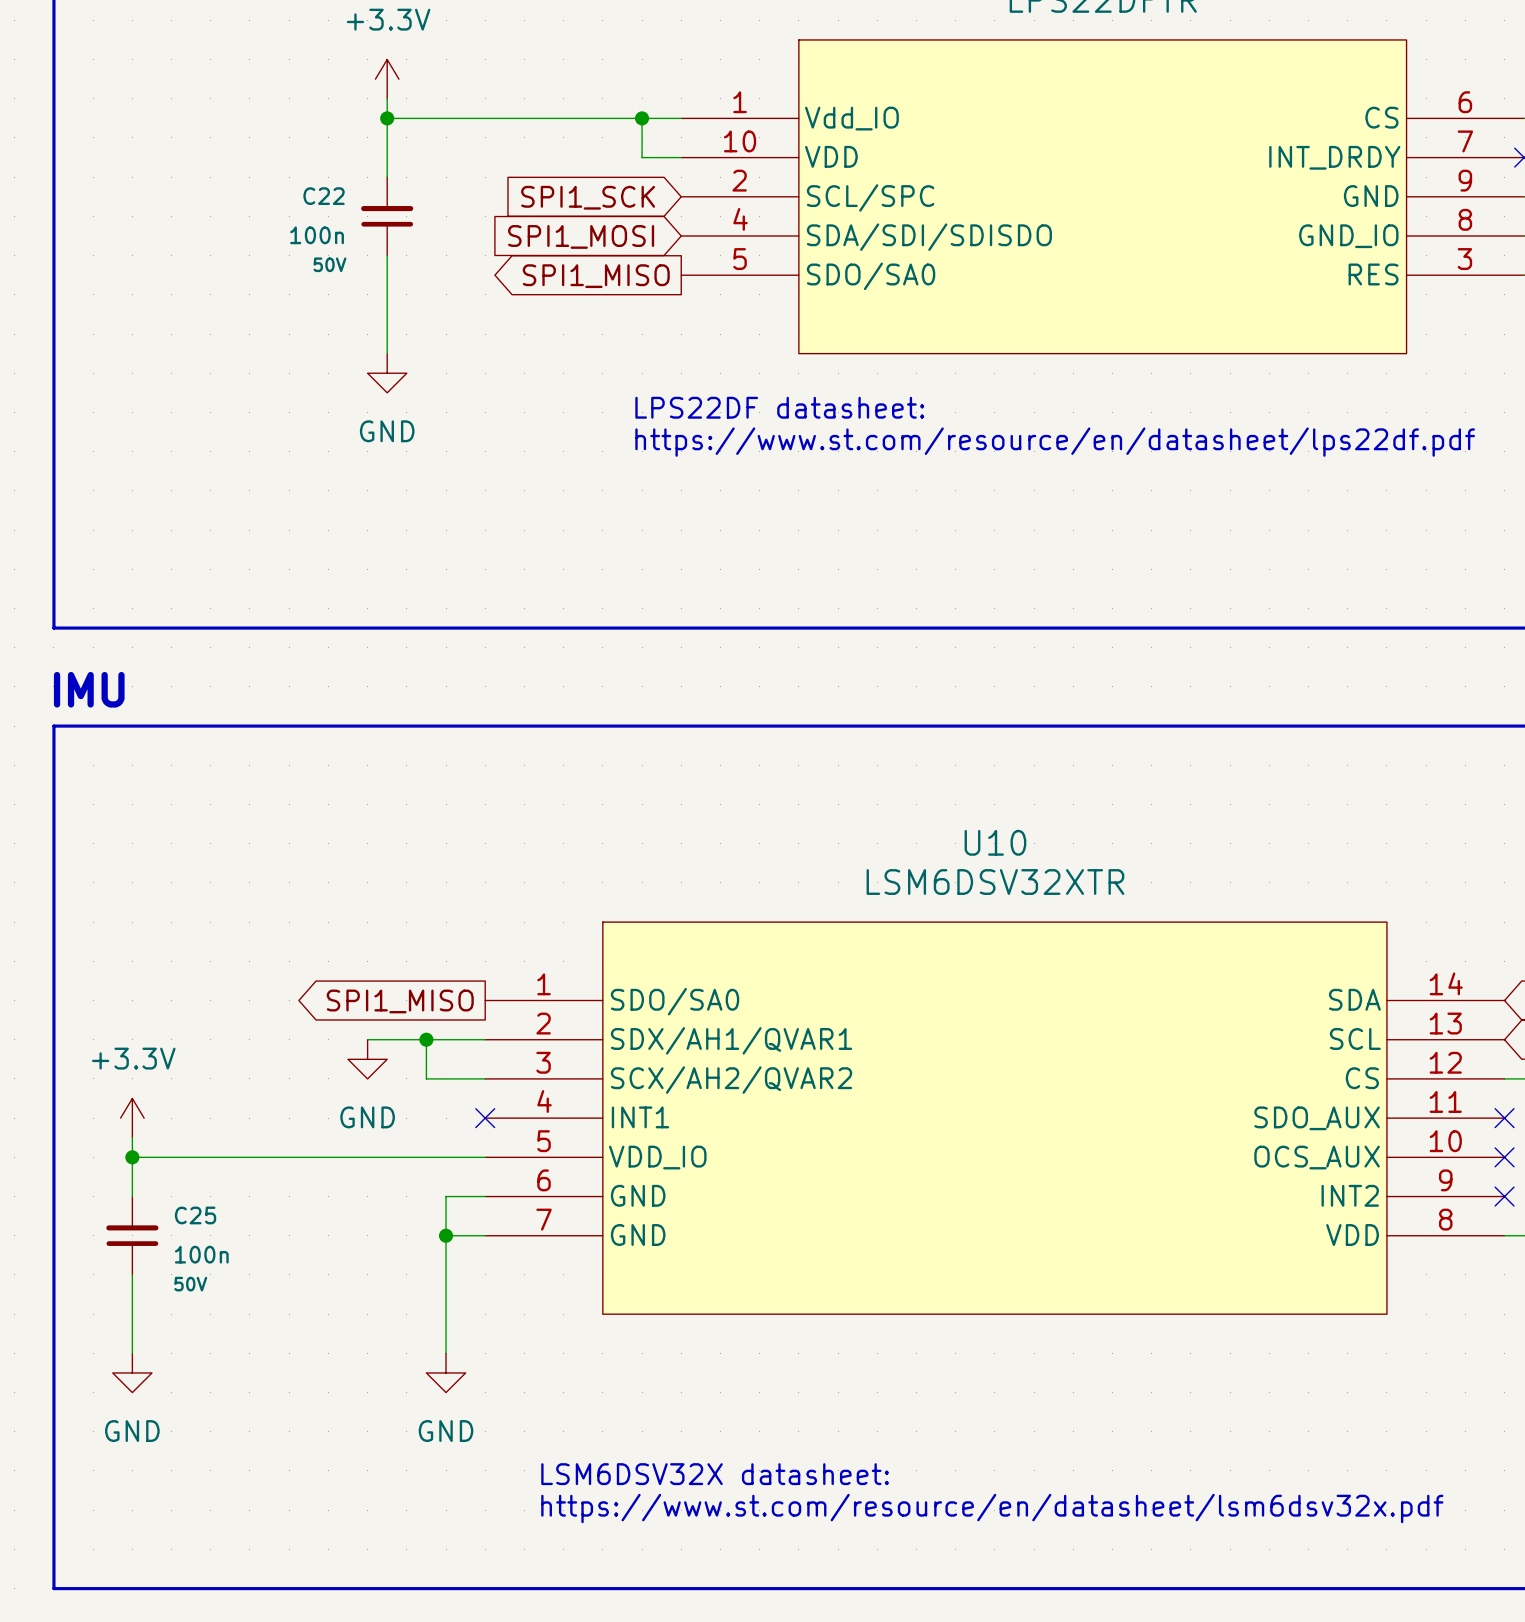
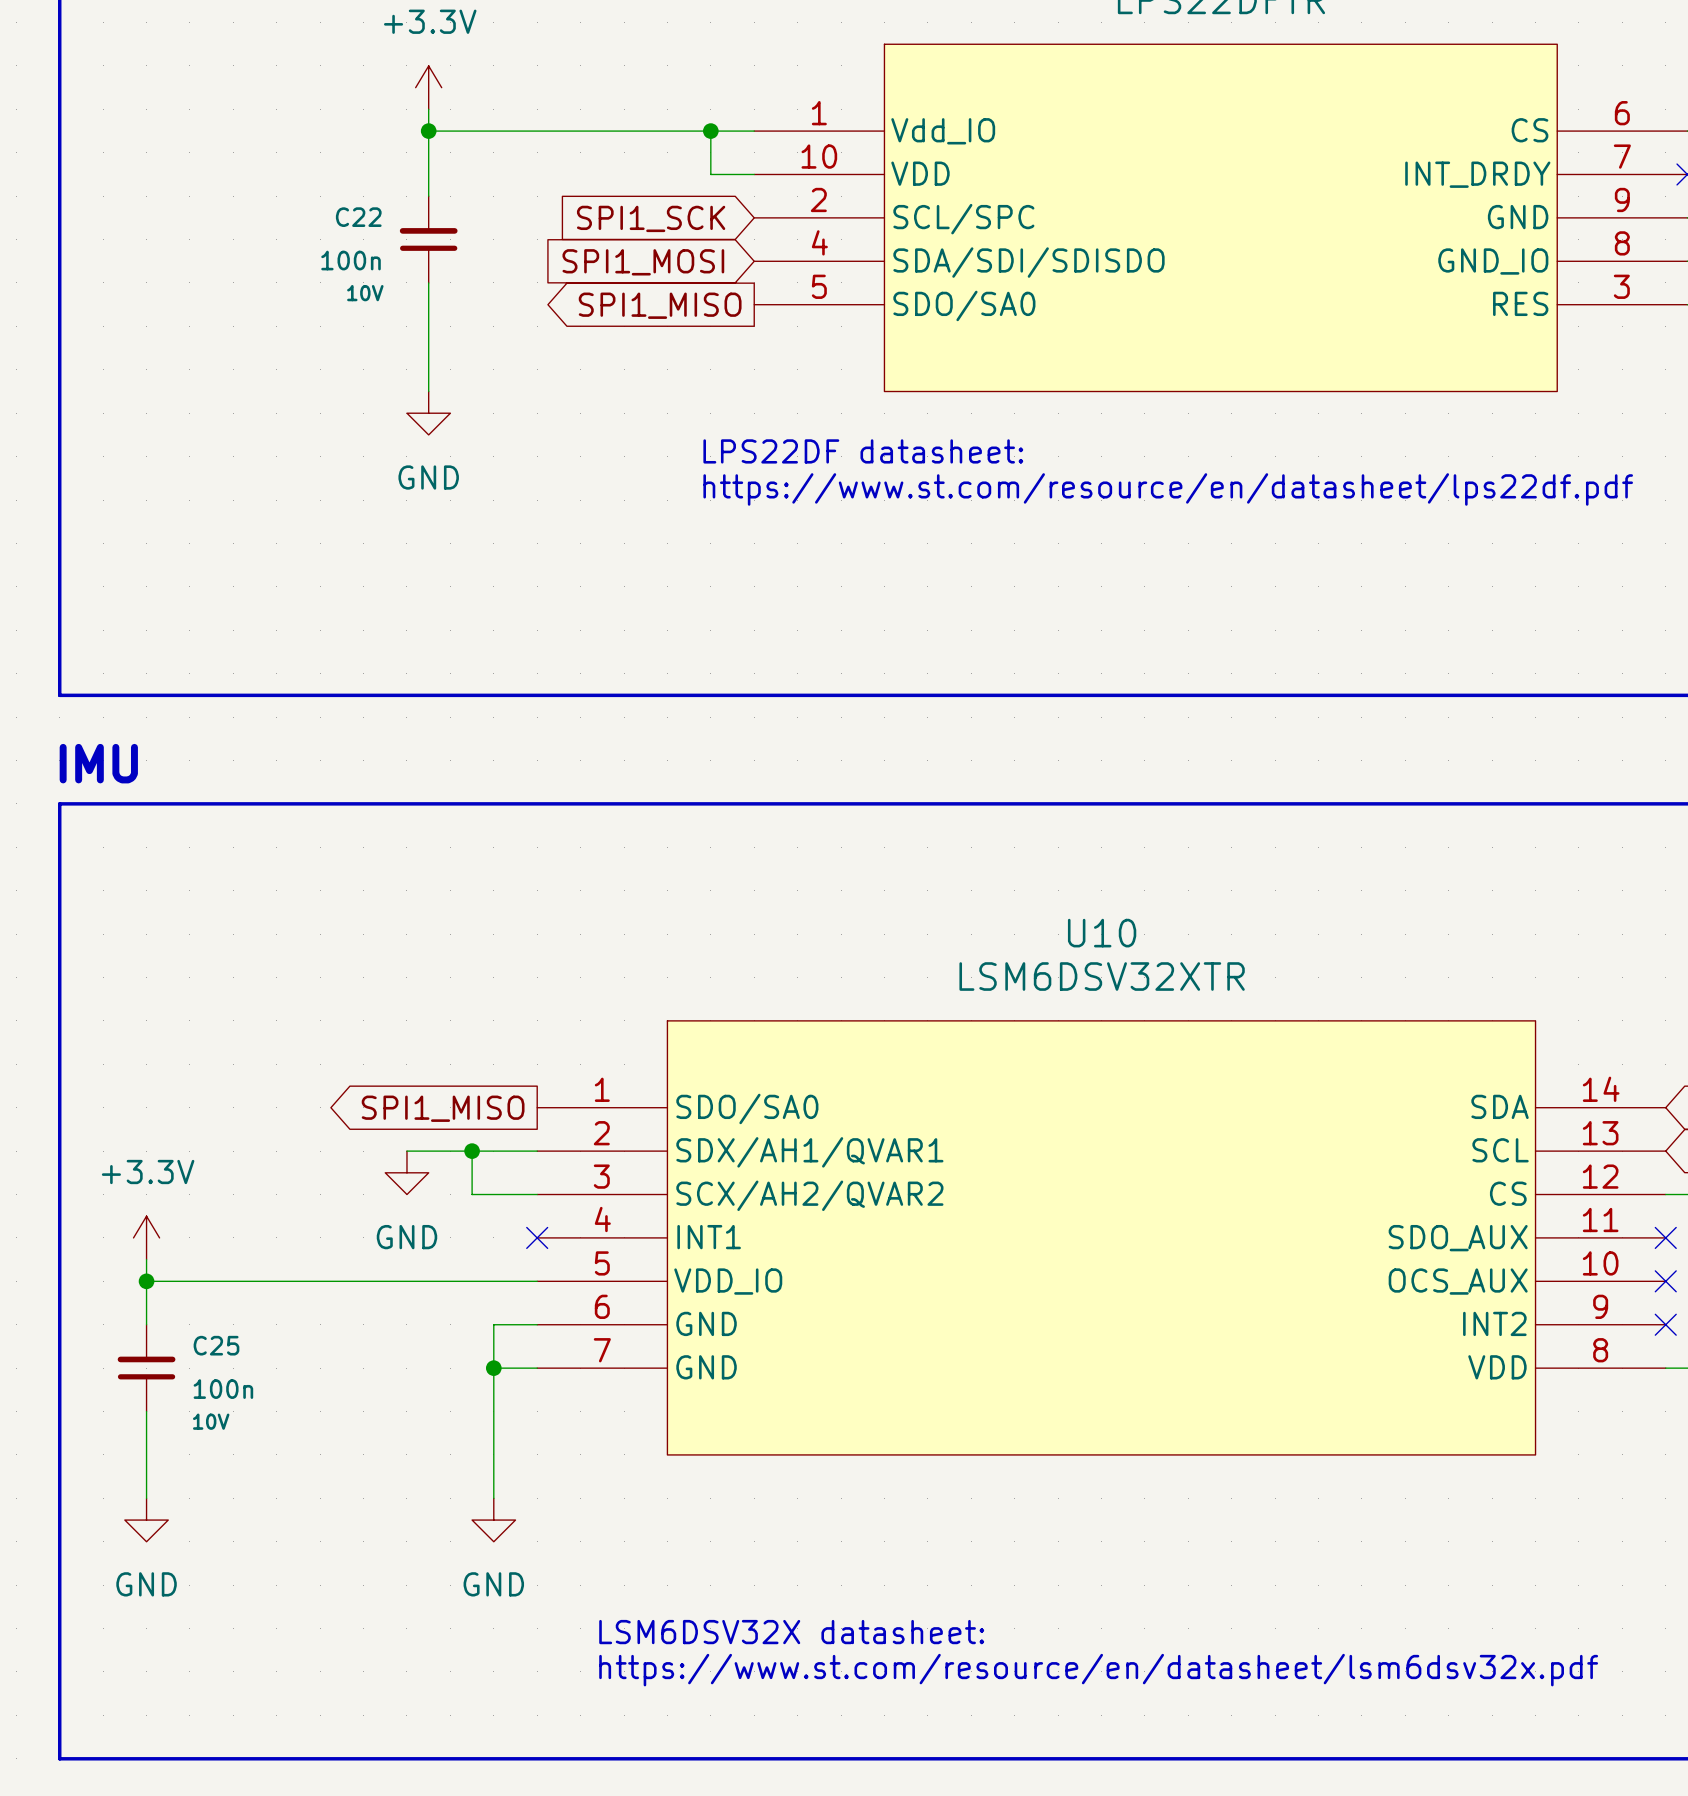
C22 text: 50V (329, 264) -> 10V (365, 293)
C25 text: 50V (190, 1284) -> 10V (211, 1421)

